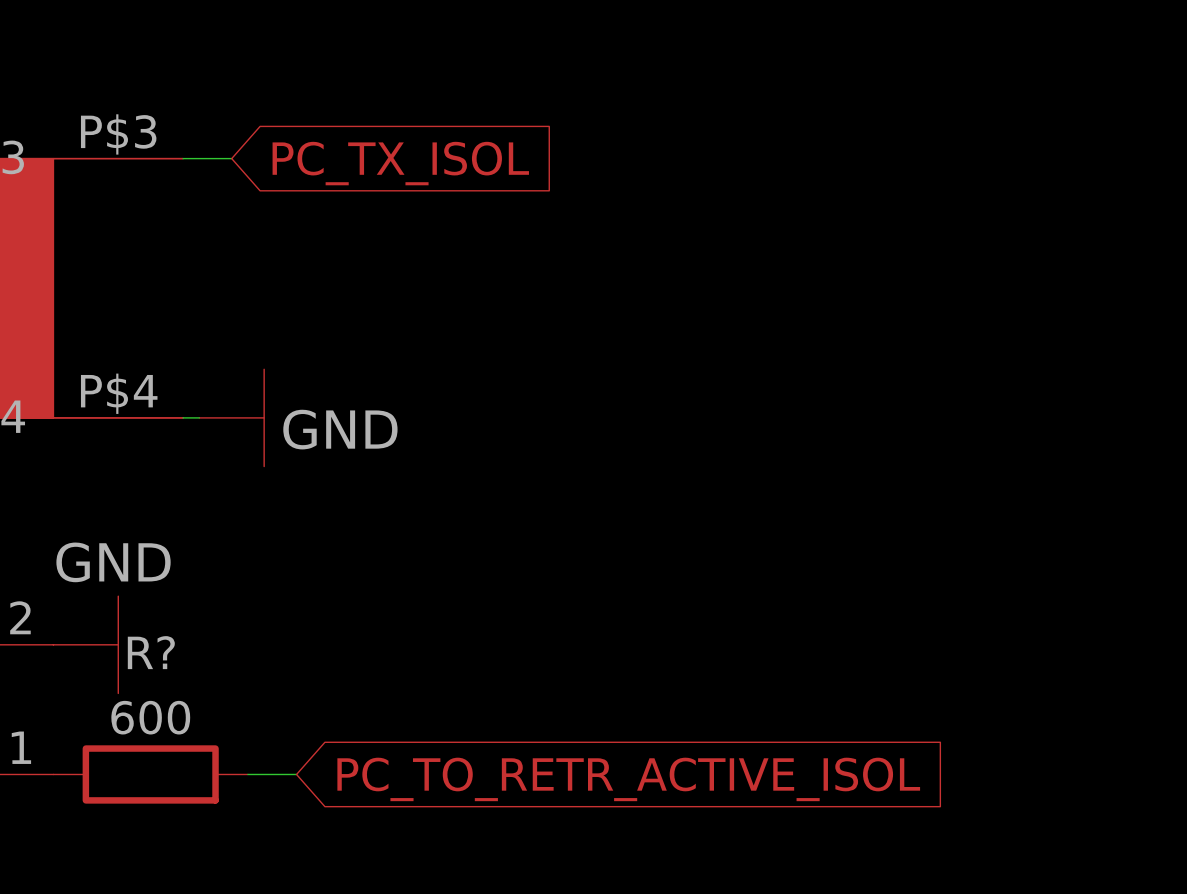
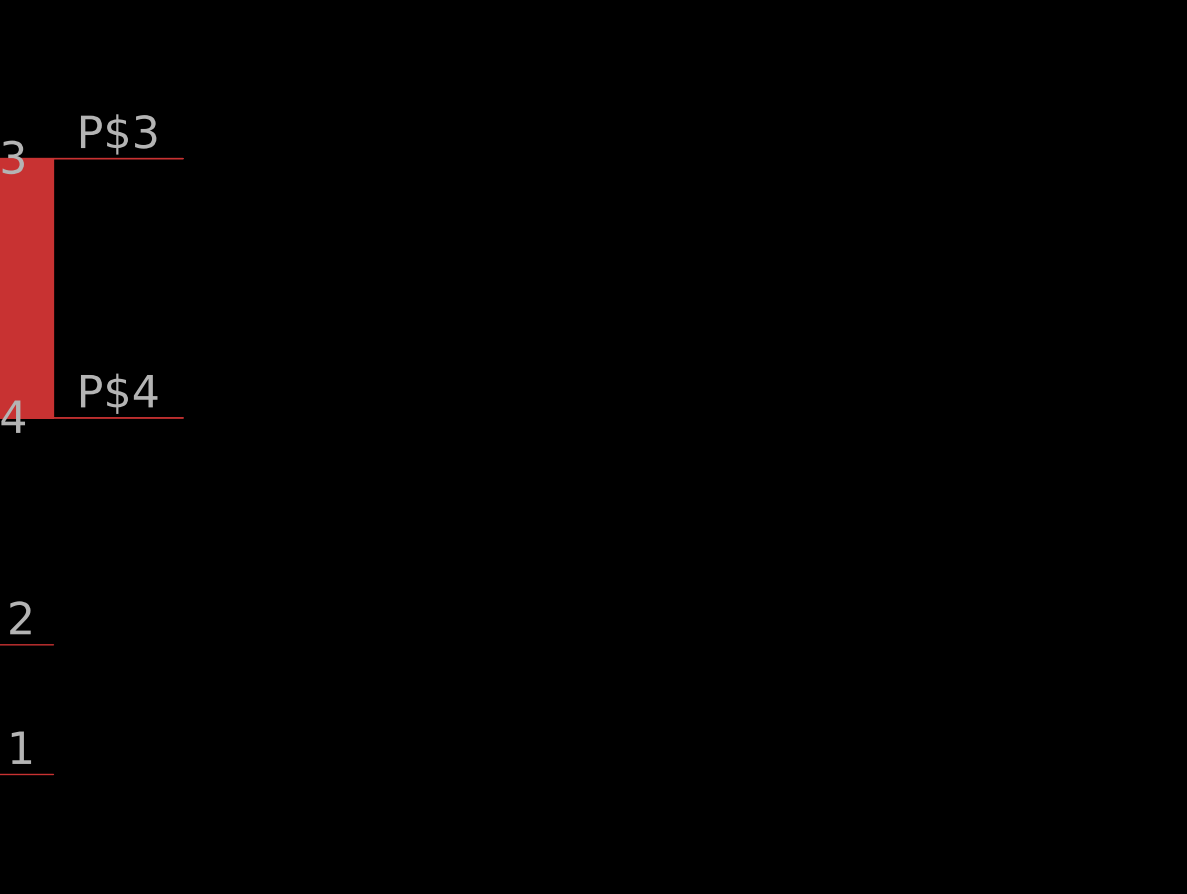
wire: (183, 158) (231, 158) -> none
global label: PC_TX_ISOL (400, 163) -> none
wire: (183, 417) (199, 417) -> none
power symbol: GND (231, 417) -> none
power symbol: GND (85, 644) -> none
R?: 600 (150, 774) -> none
wire: (247, 774) (296, 774) -> none
global label: PC_TO_RETR_ACTIVE_ISOL (628, 779) -> none

